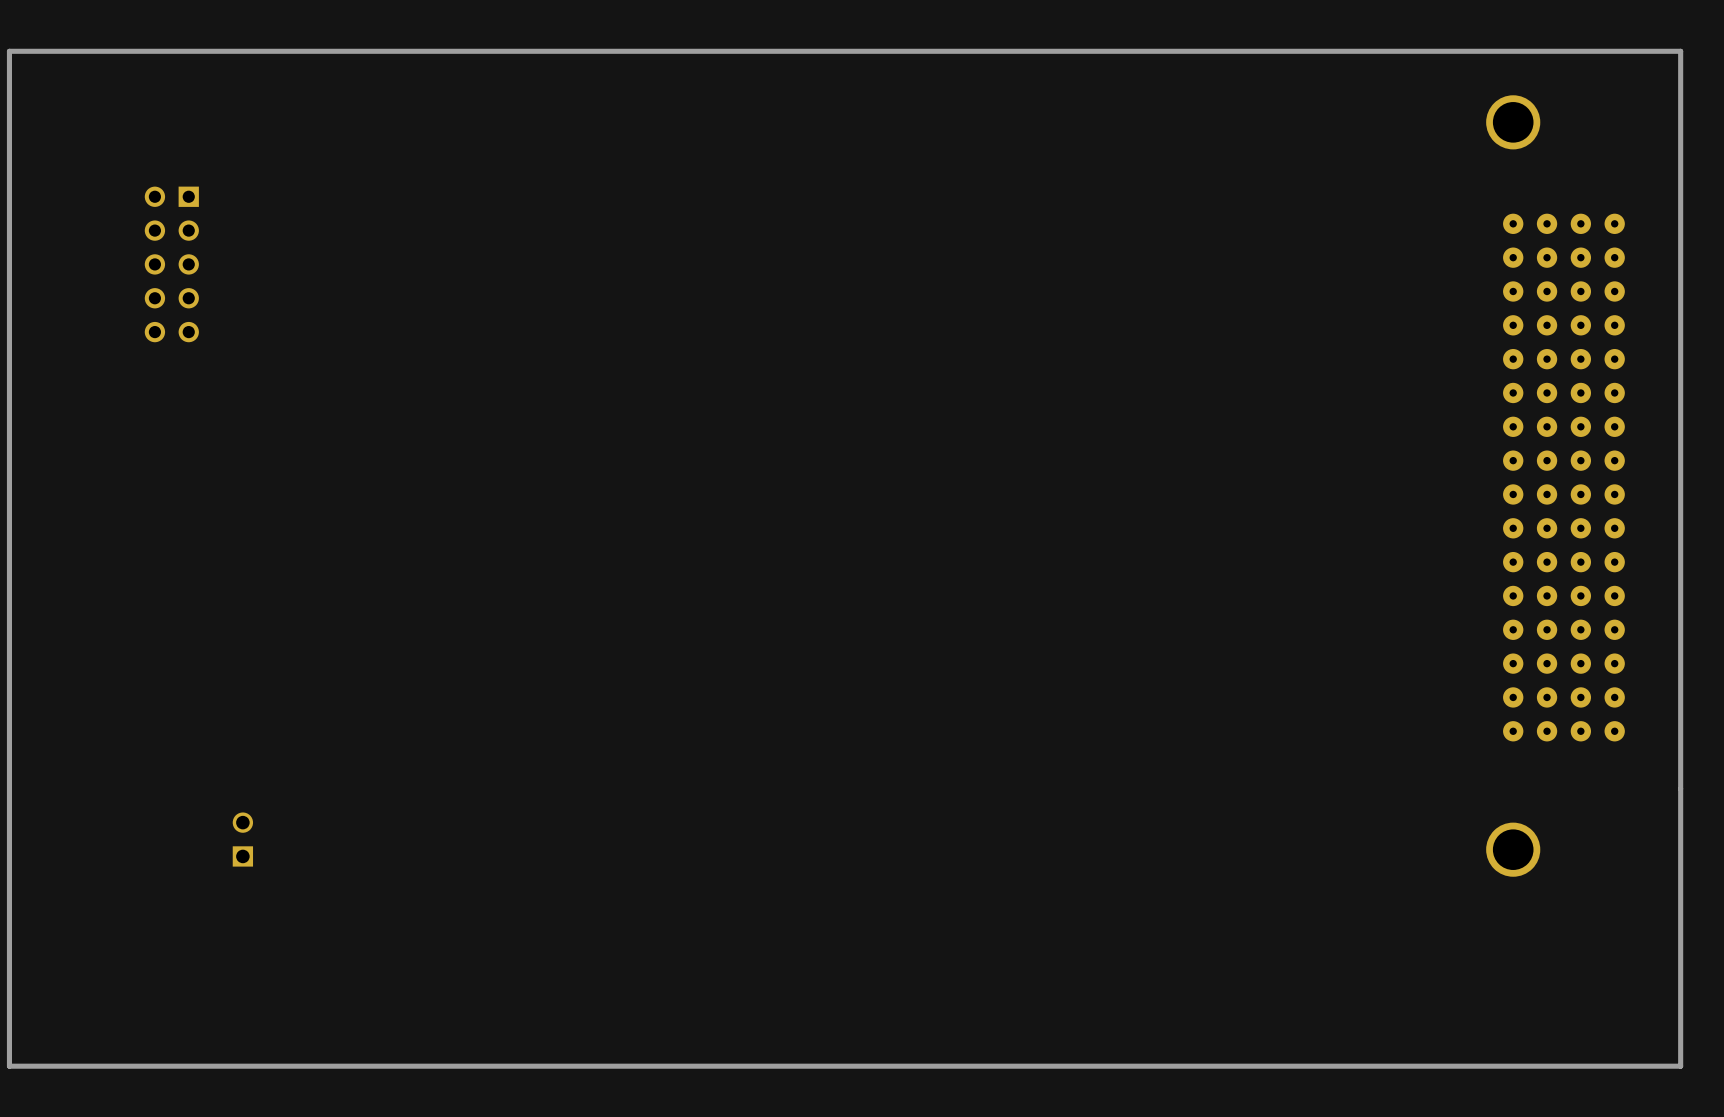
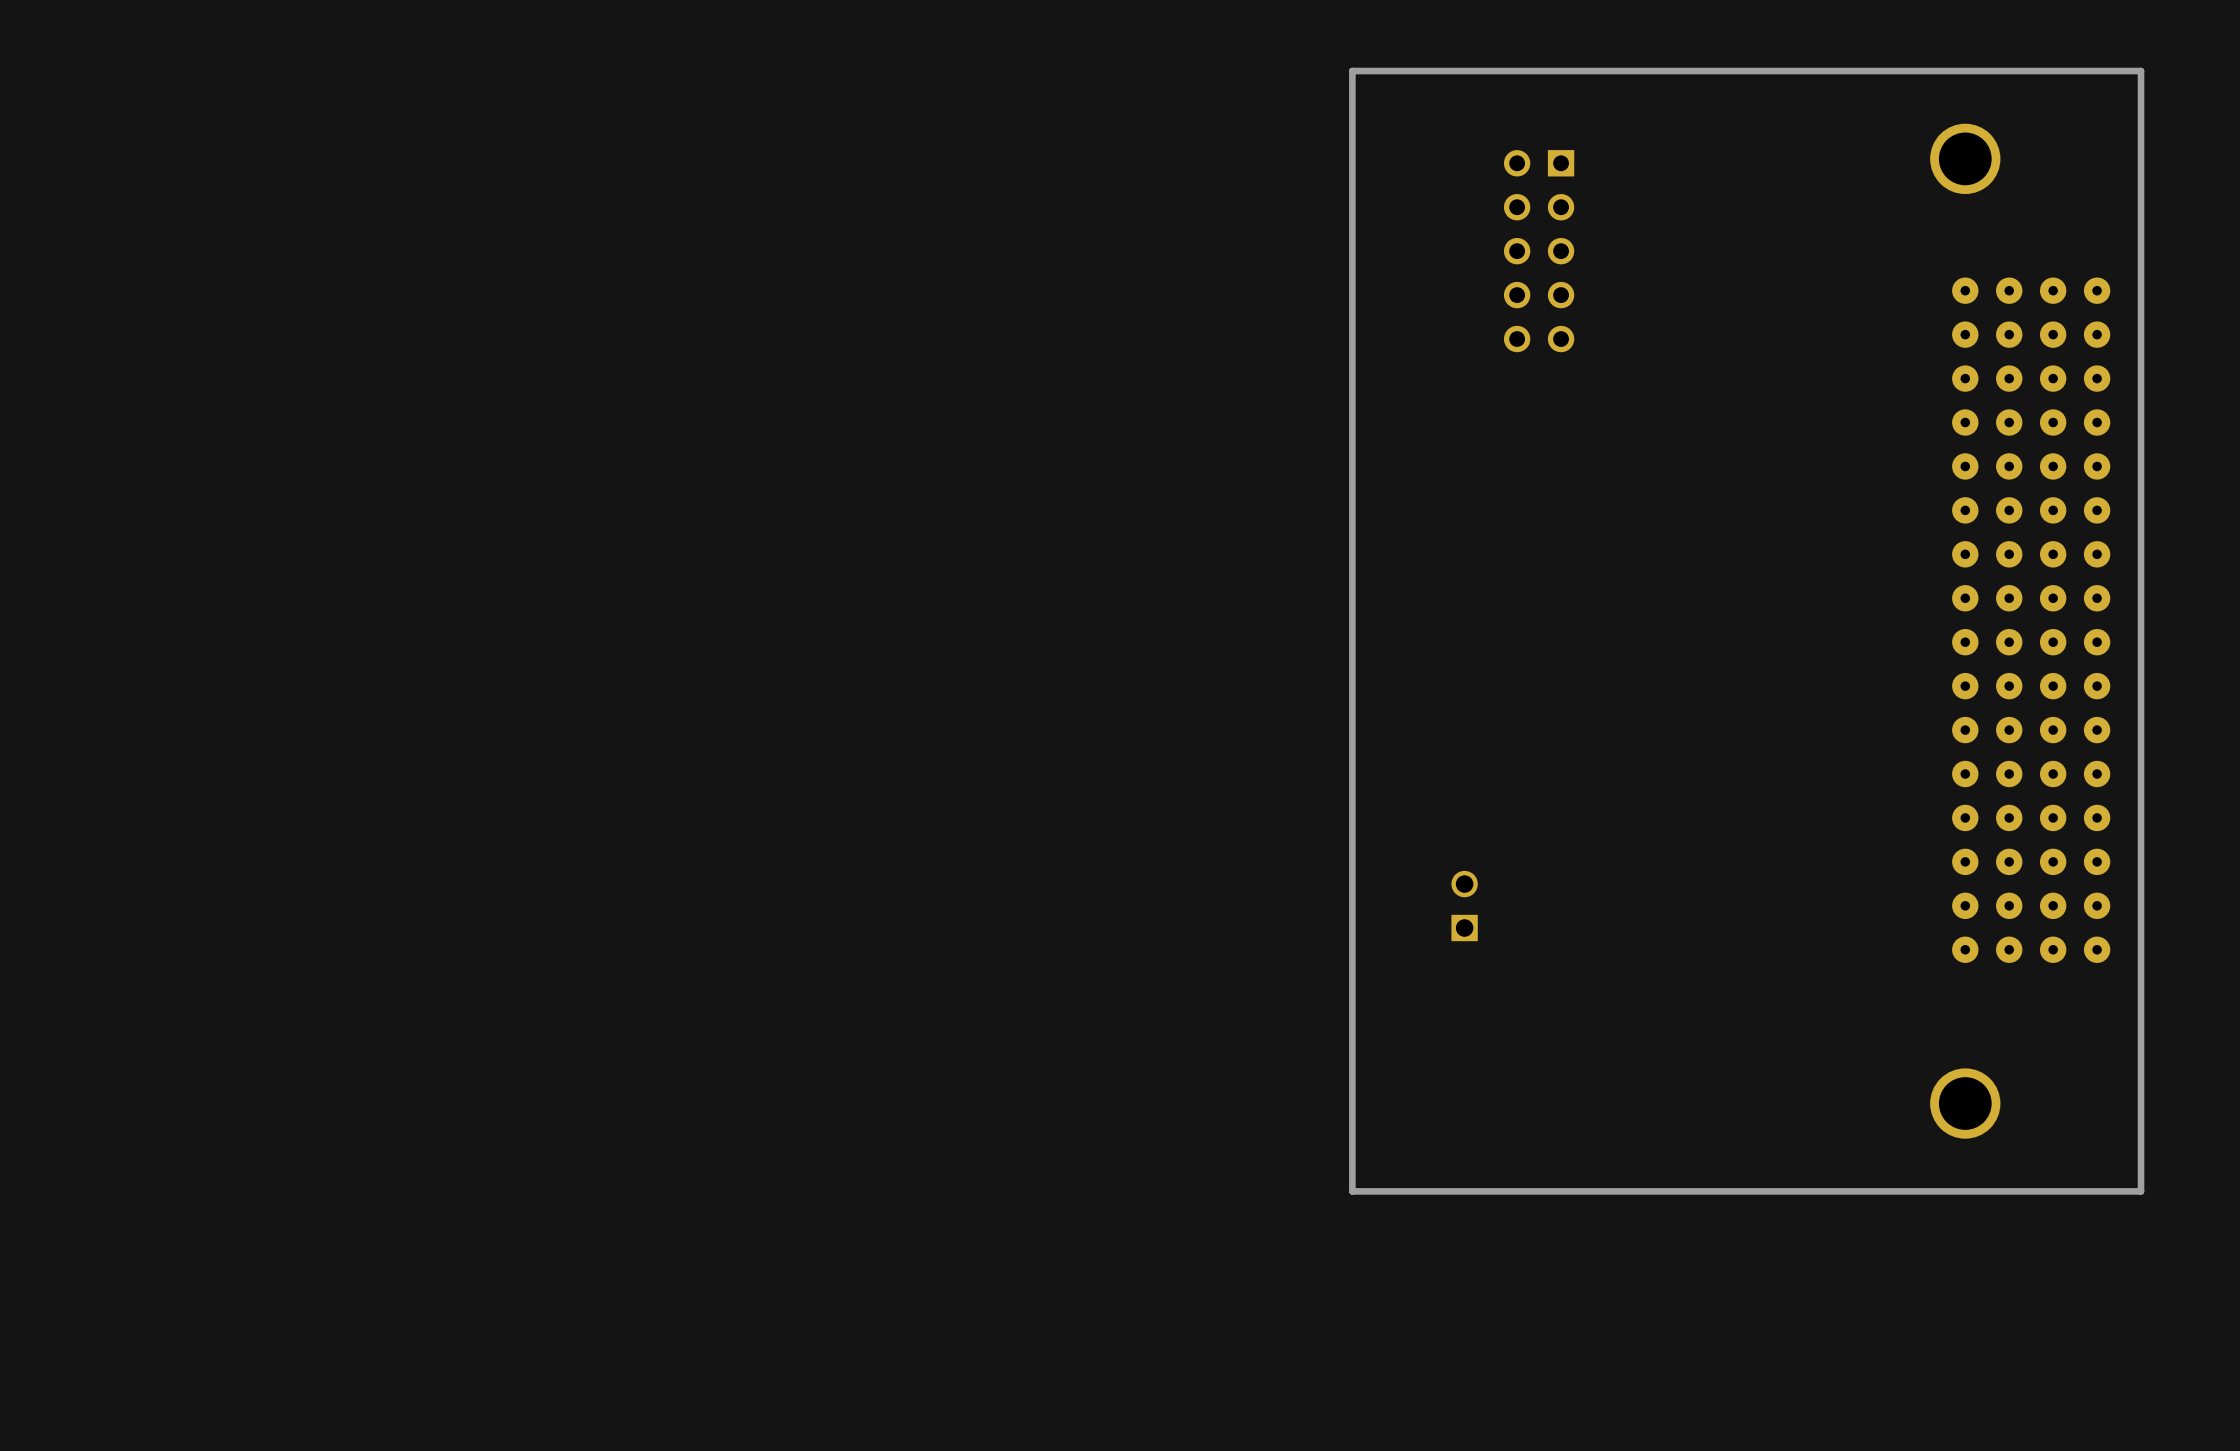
board edge: (1680, 51) (1680, 1066) (9, 1066) (9, 51) (1680, 51) -> none
board edge: none -> (2141, 71) (2141, 1191) (1352, 1191) (1352, 71) (2141, 71)
part: none -> (1539, 251)
part: (171, 264) -> none
part: none -> (1464, 906)
part: (242, 839) -> none

